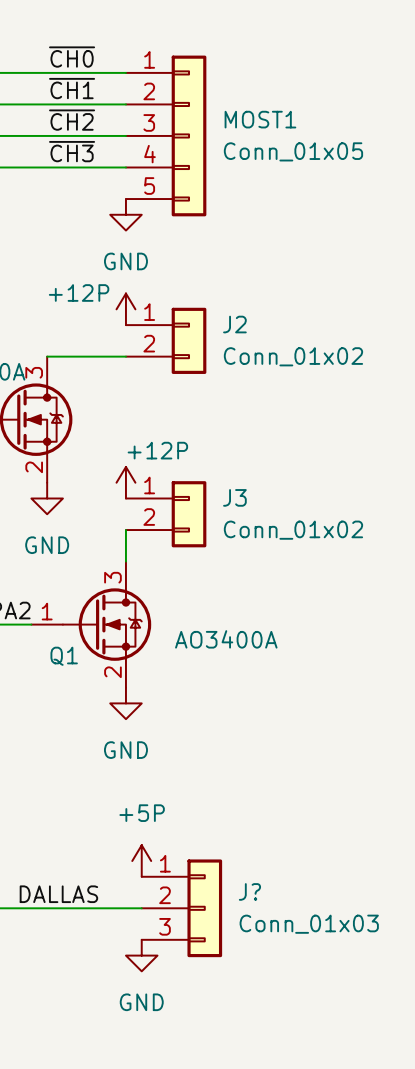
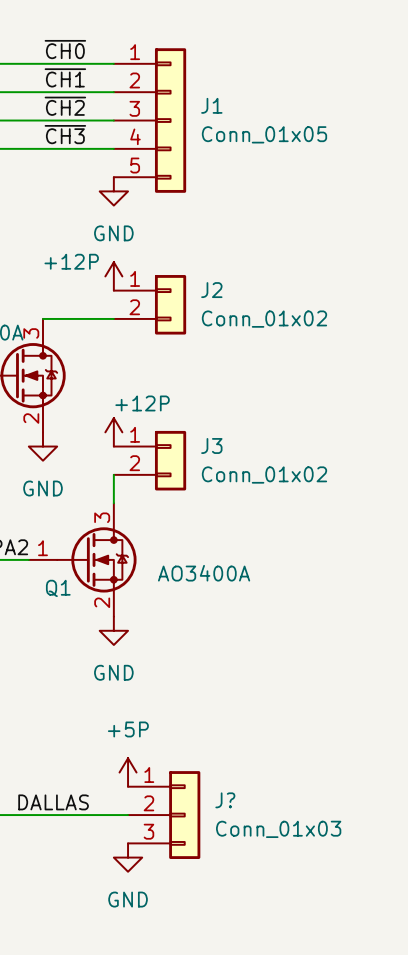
MOST1 name: MOST1 (260, 119) -> J1 (211, 105)

